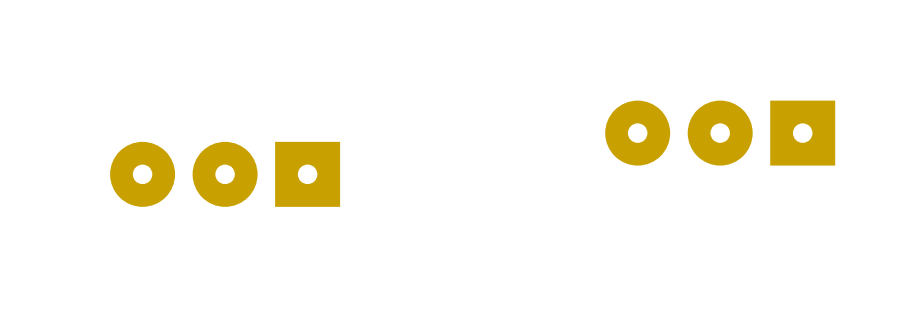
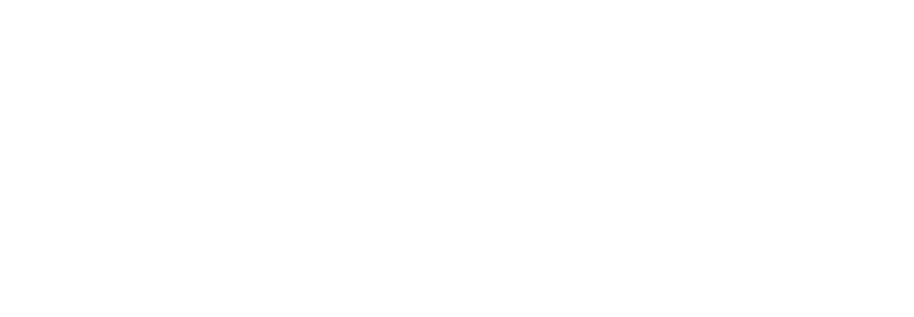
part: (720, 133) -> none
part: (225, 174) -> none

